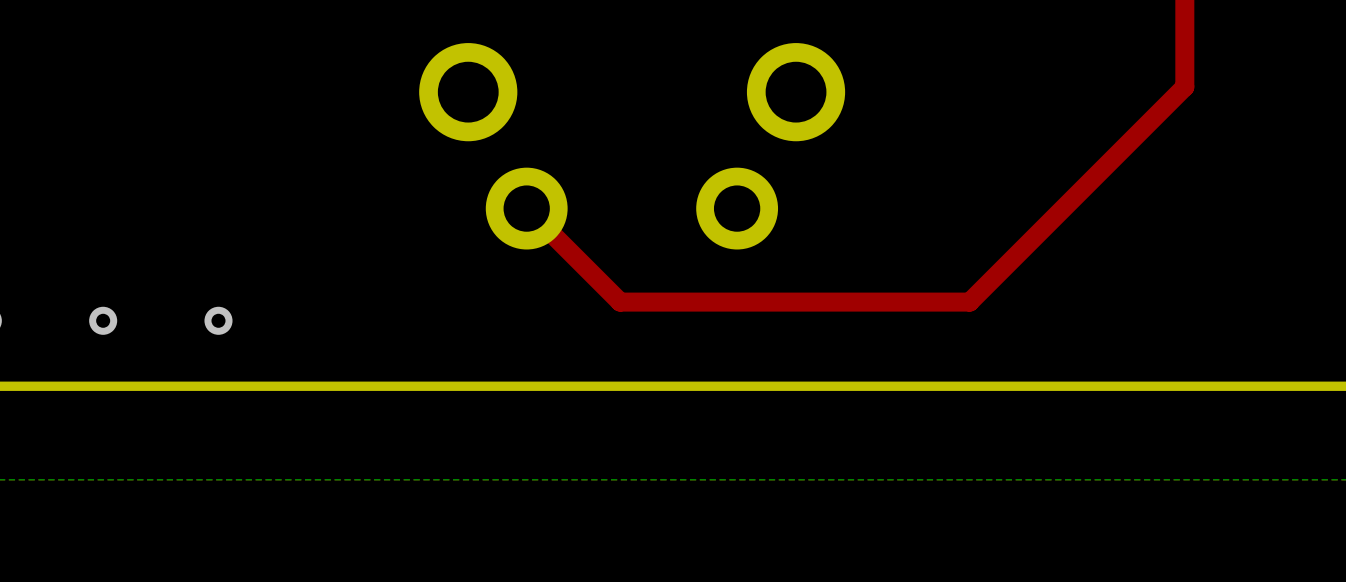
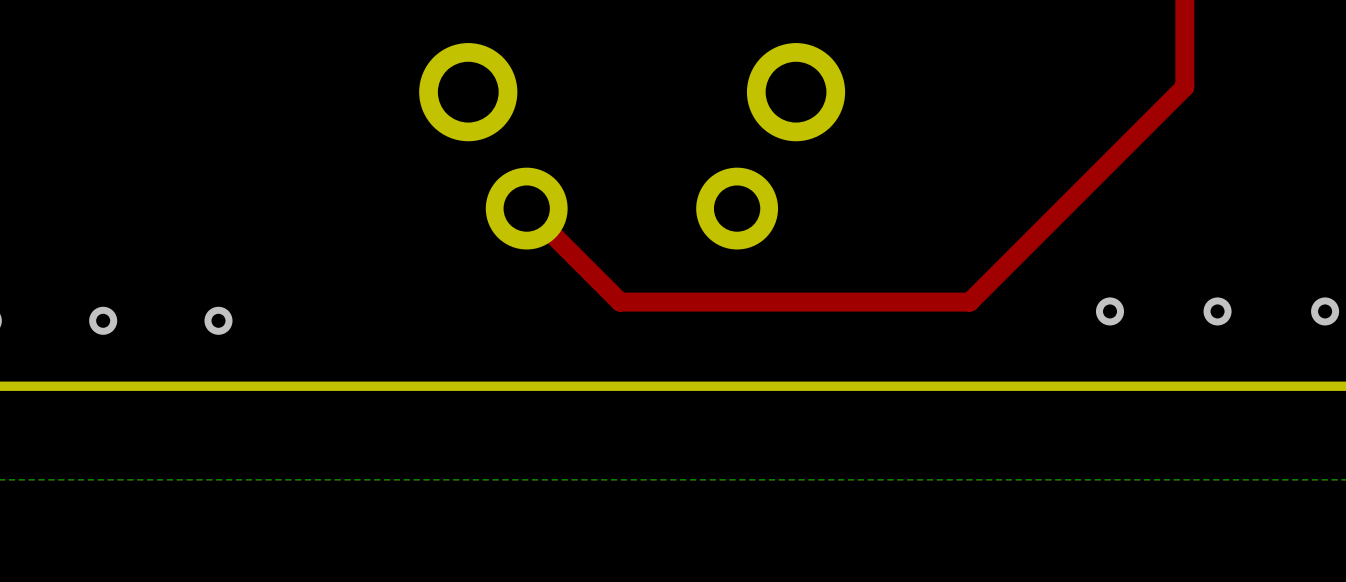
via: none -> (1110, 311)
via: none -> (1217, 311)
via: none -> (1325, 311)

